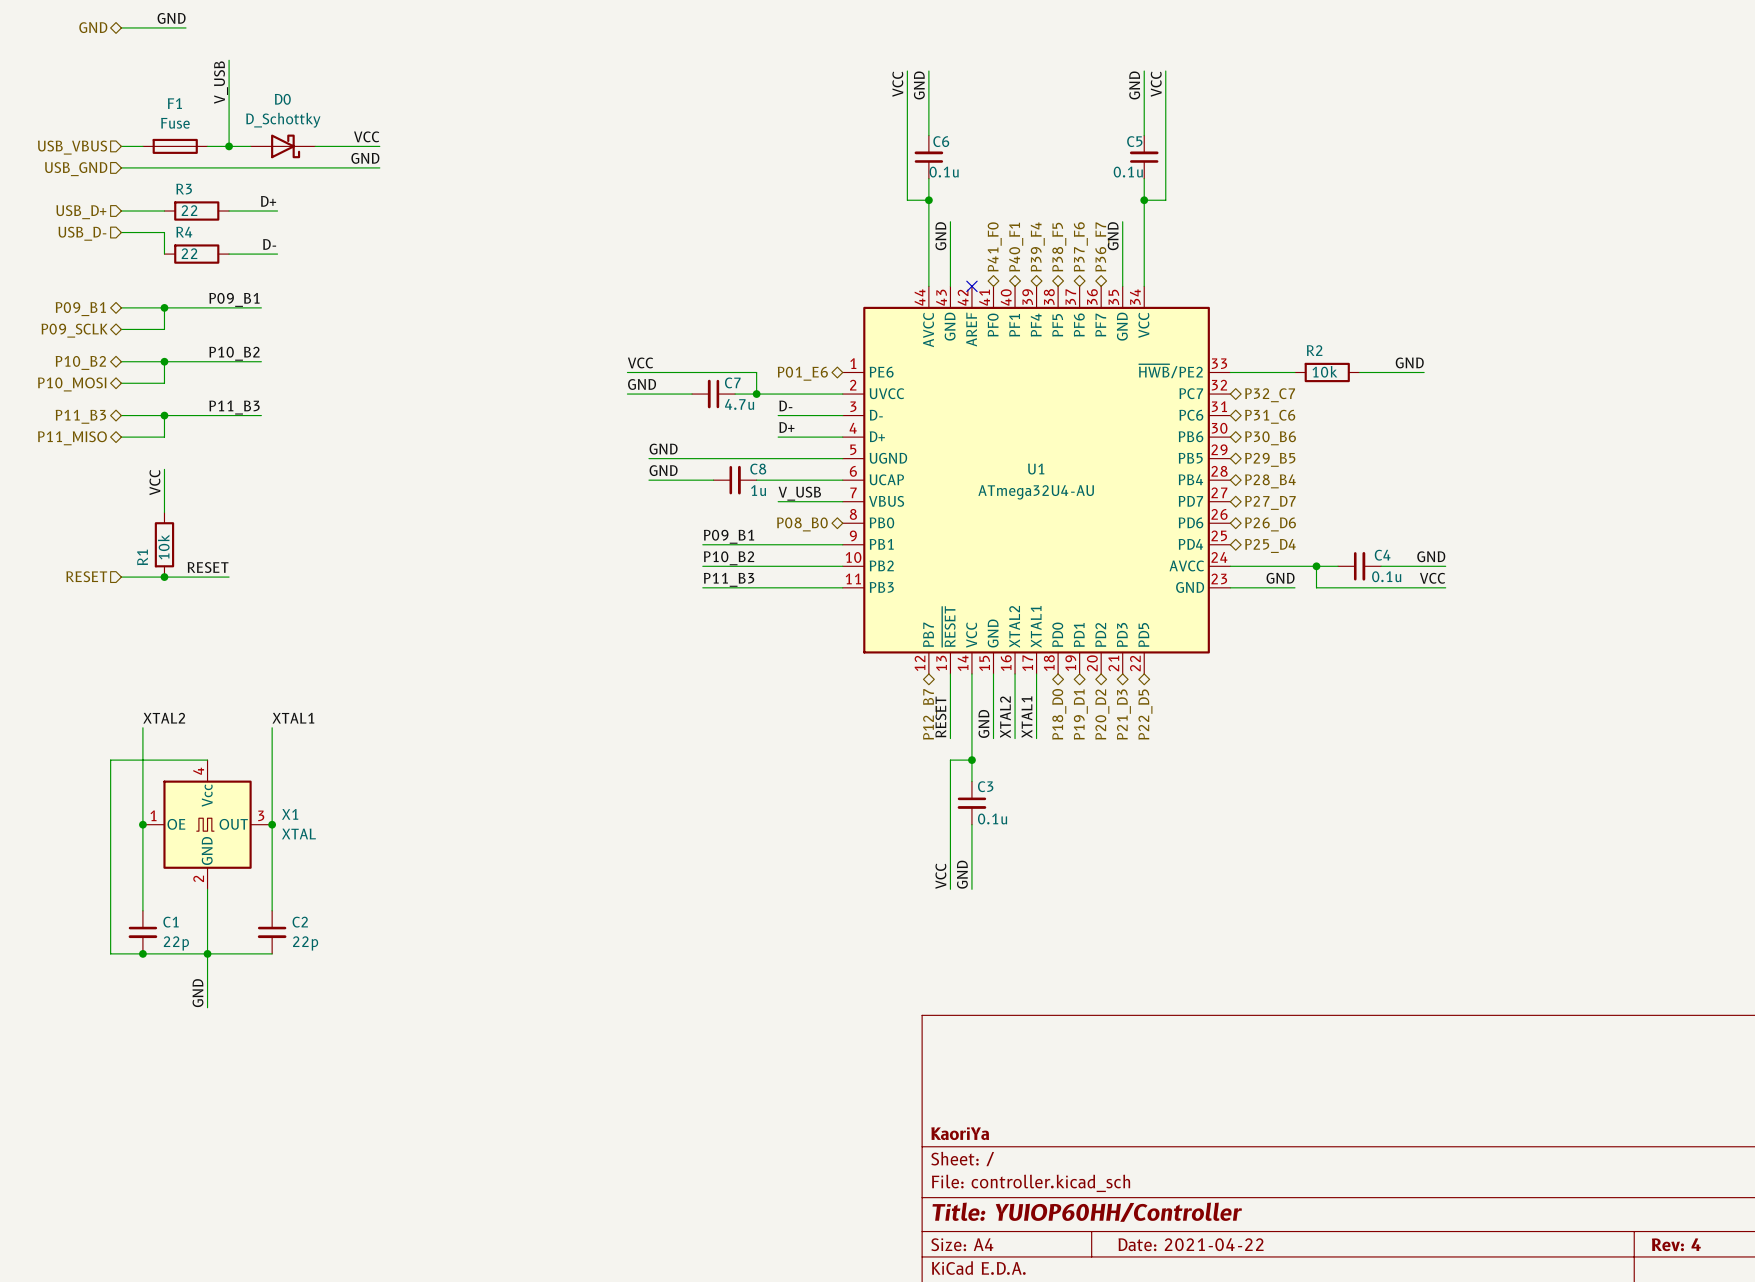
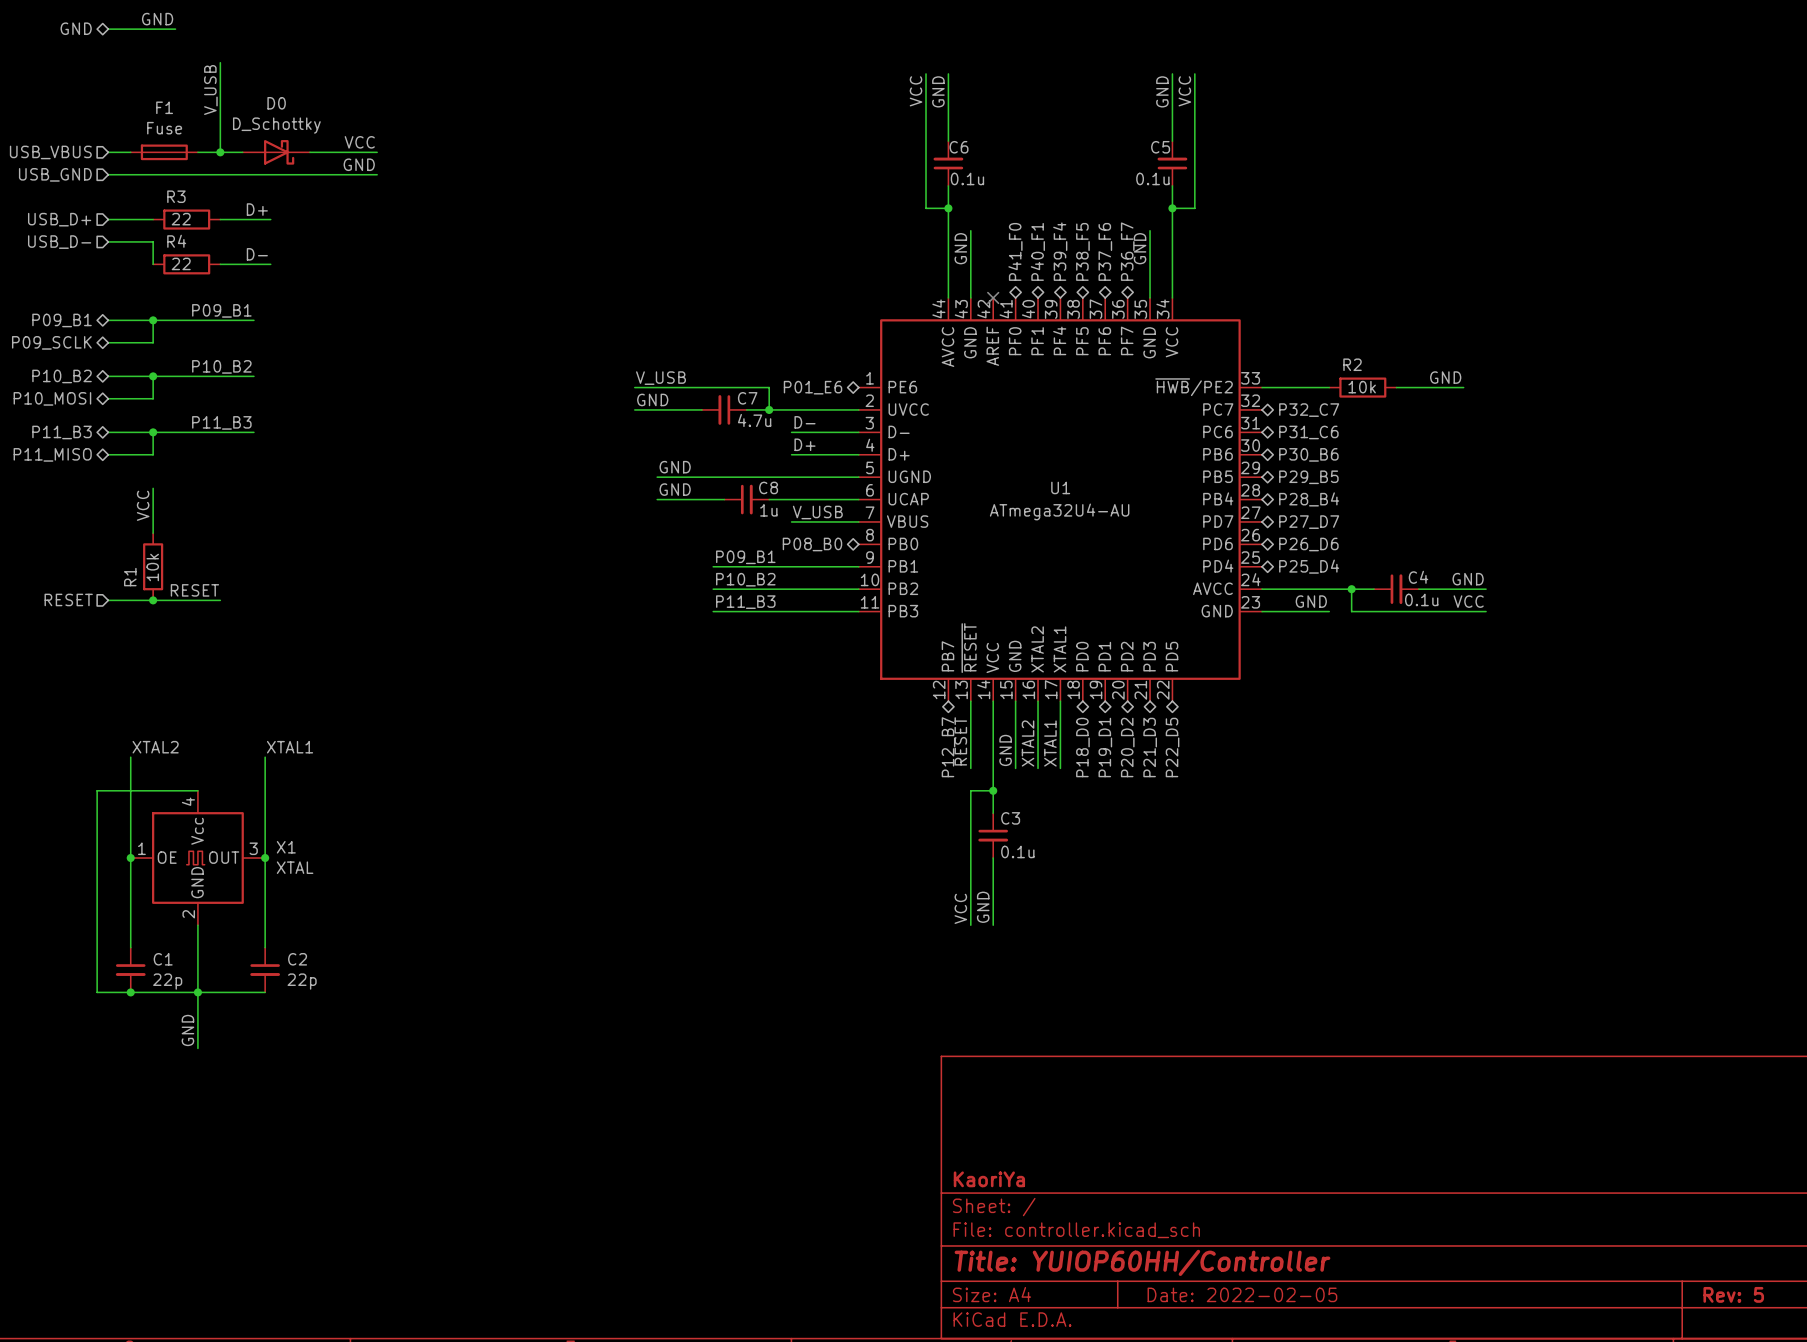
label: VCC (640, 362) -> V_USB (661, 378)
title block: Date: 2021-04-22 (1191, 1244) -> Date: 2022-02-05 (1242, 1294)
title block: Rev: 4 (1676, 1244) -> Rev: 5 (1733, 1294)

